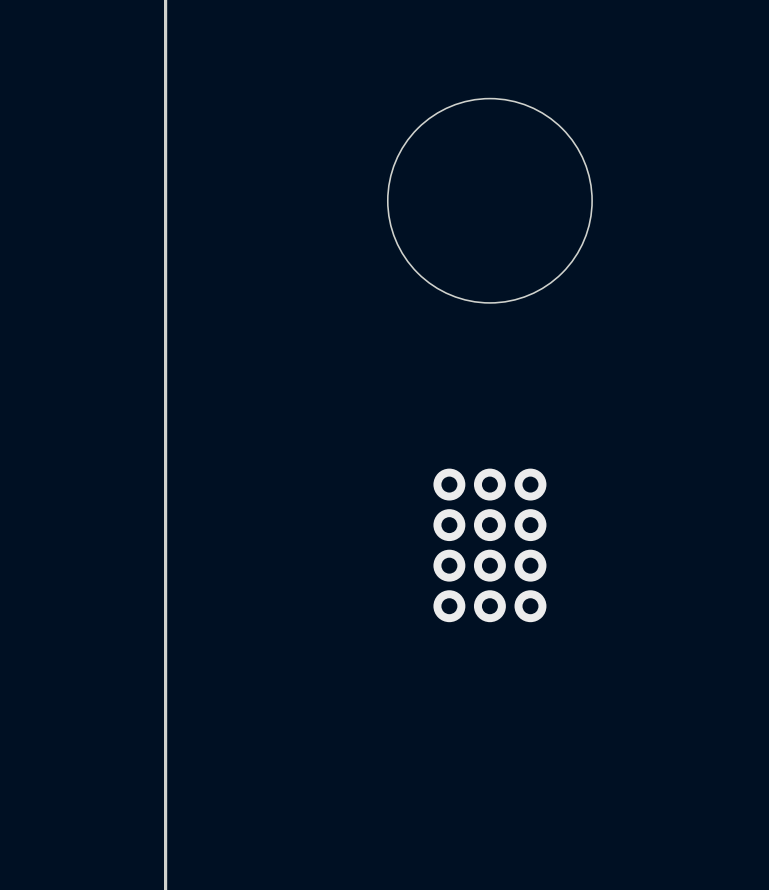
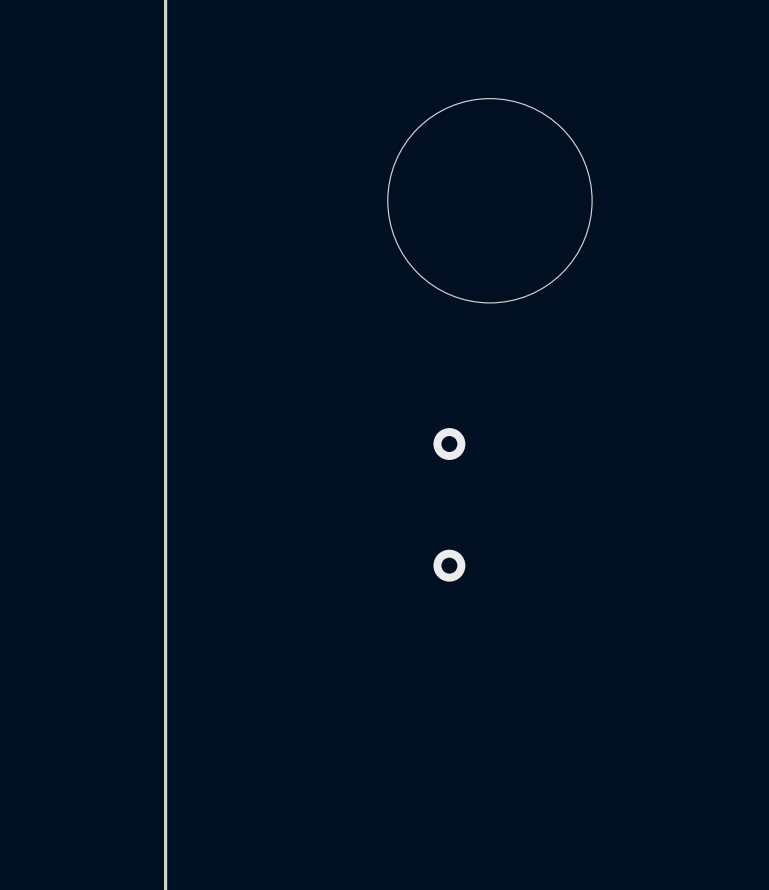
via: none -> (449, 444)
via: (449, 484) -> none
via: (489, 484) -> none
via: (530, 484) -> none
via: (449, 525) -> none
via: (489, 525) -> none
via: (530, 525) -> none
via: (489, 565) -> none
via: (530, 565) -> none
via: (449, 606) -> none
via: (489, 606) -> none
via: (530, 606) -> none

